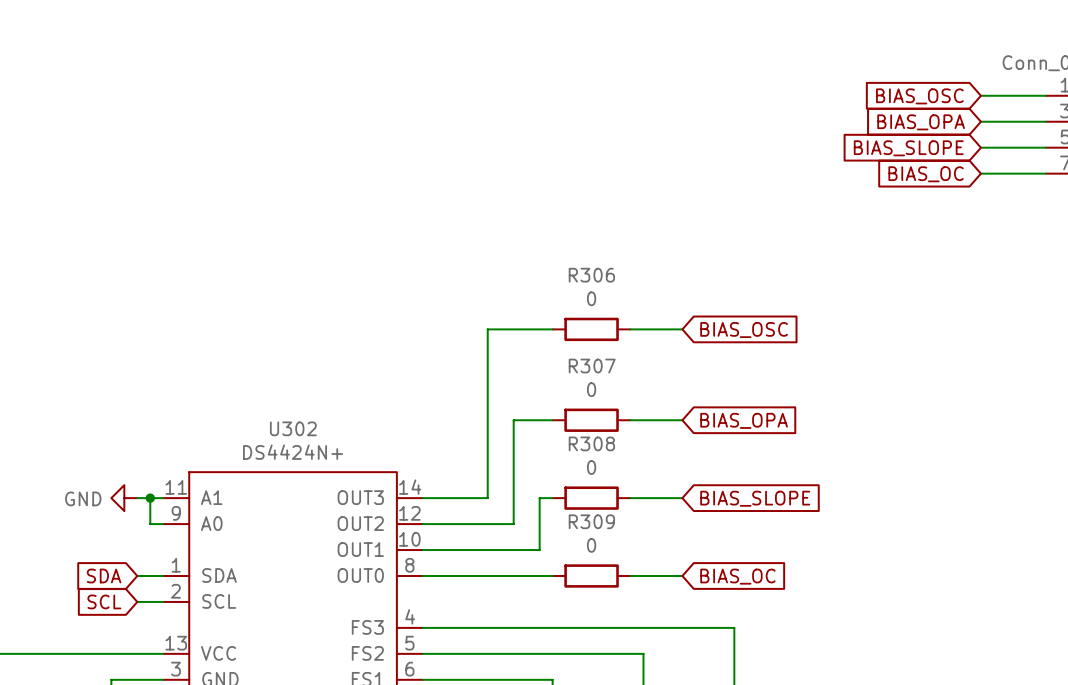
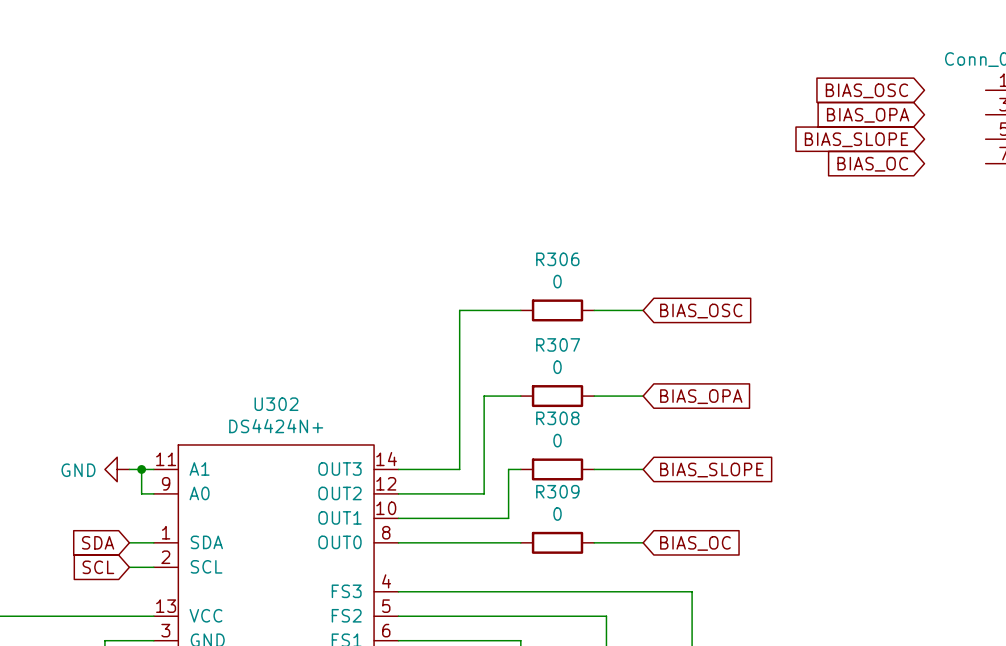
wire: (980, 95) (1045, 95) -> none
wire: (980, 121) (1045, 121) -> none
wire: (980, 147) (1045, 147) -> none
wire: (980, 173) (1045, 173) -> none

